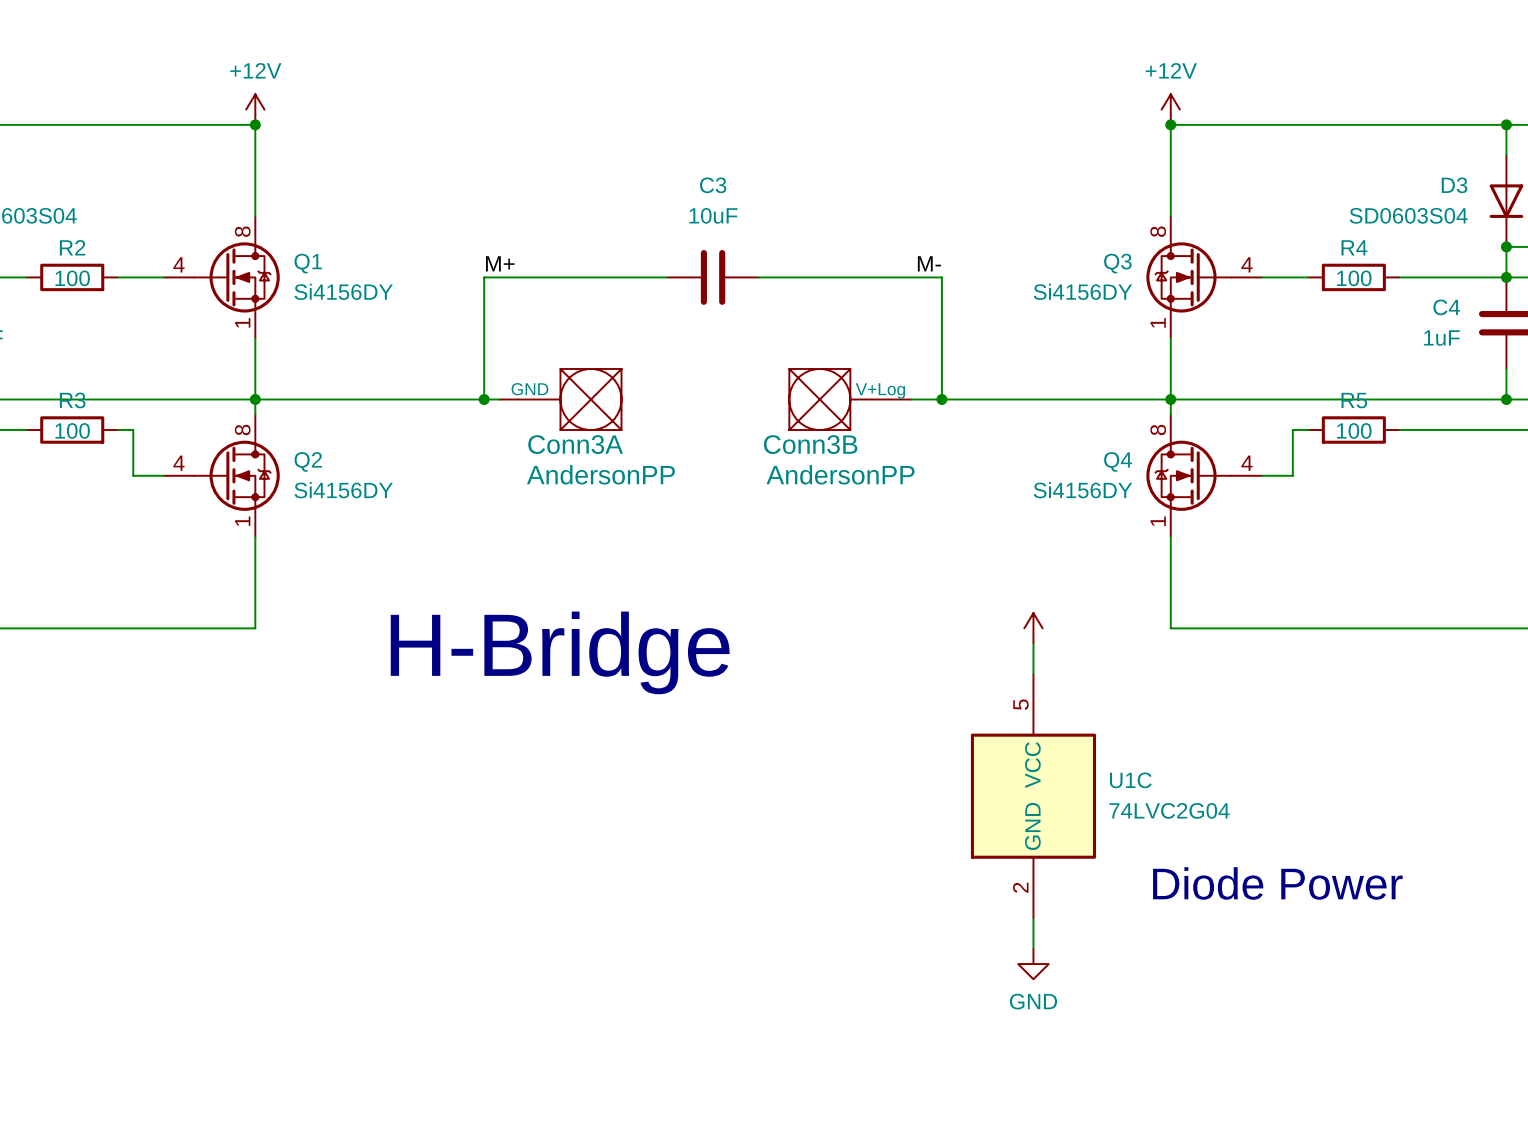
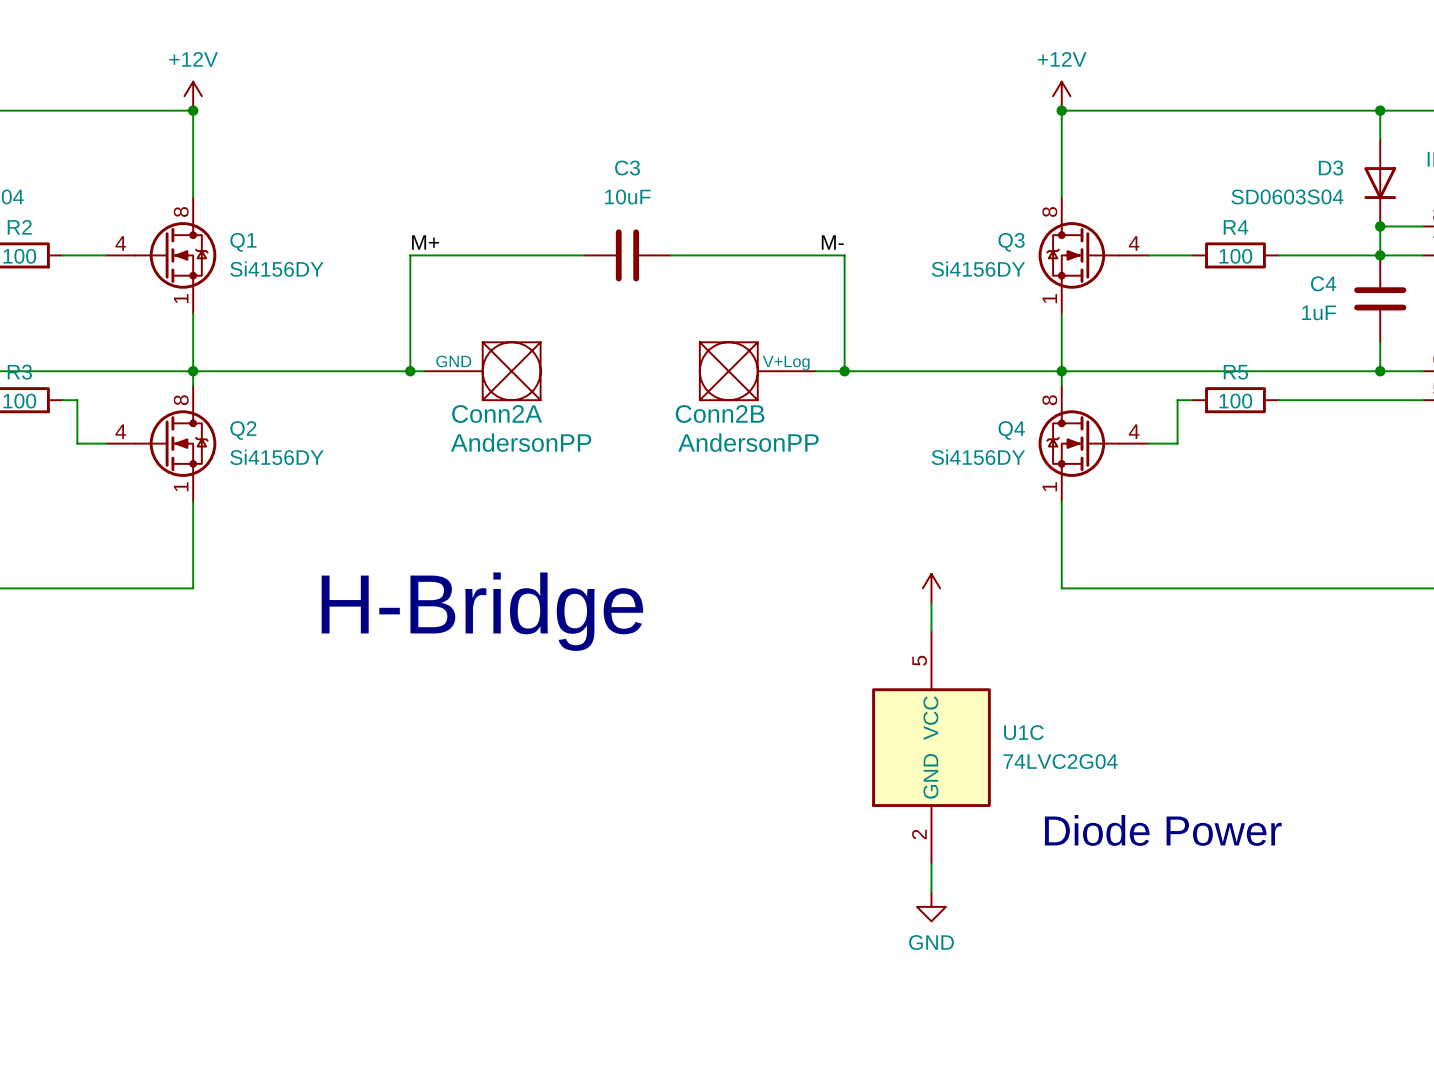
Conn3A name: Conn3A (575, 444) -> Conn2A (497, 414)
Conn3B name: Conn3B (810, 444) -> Conn2B (720, 414)

